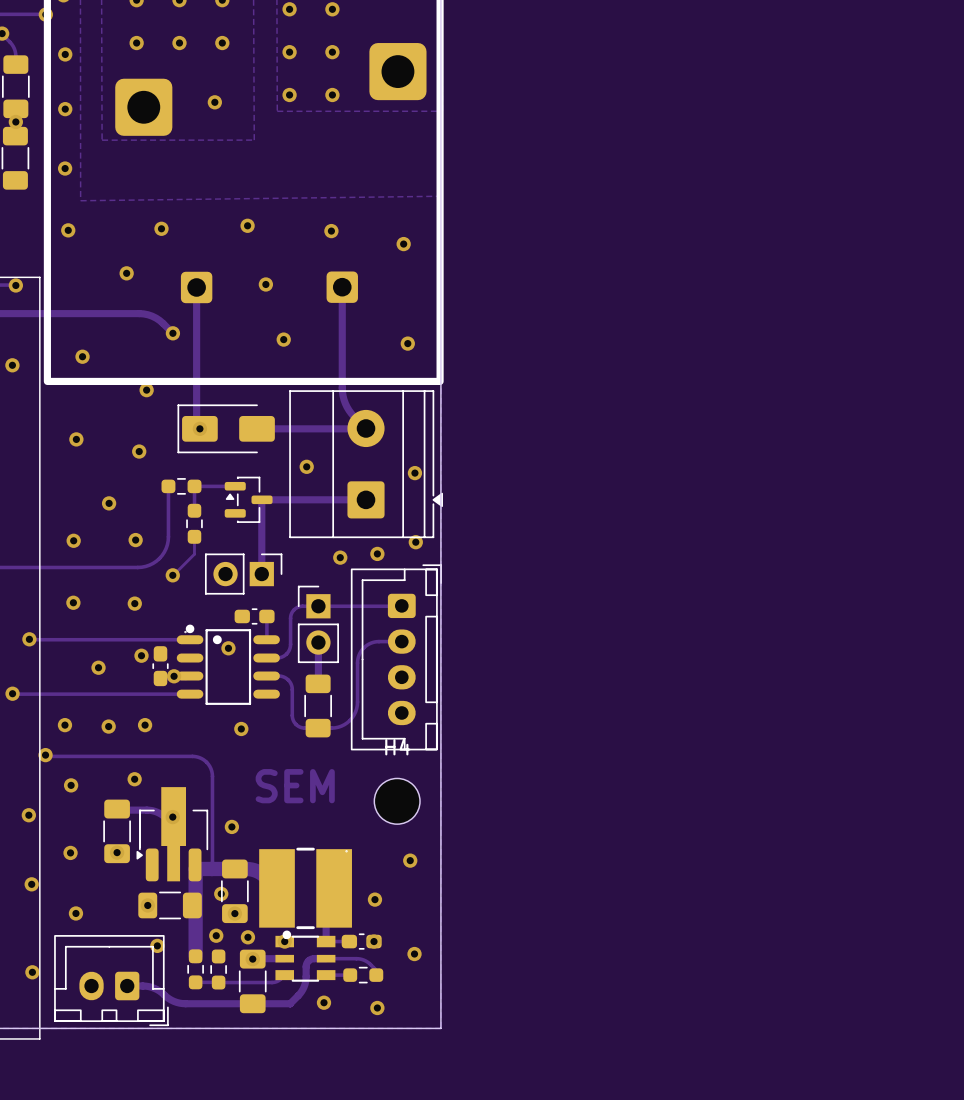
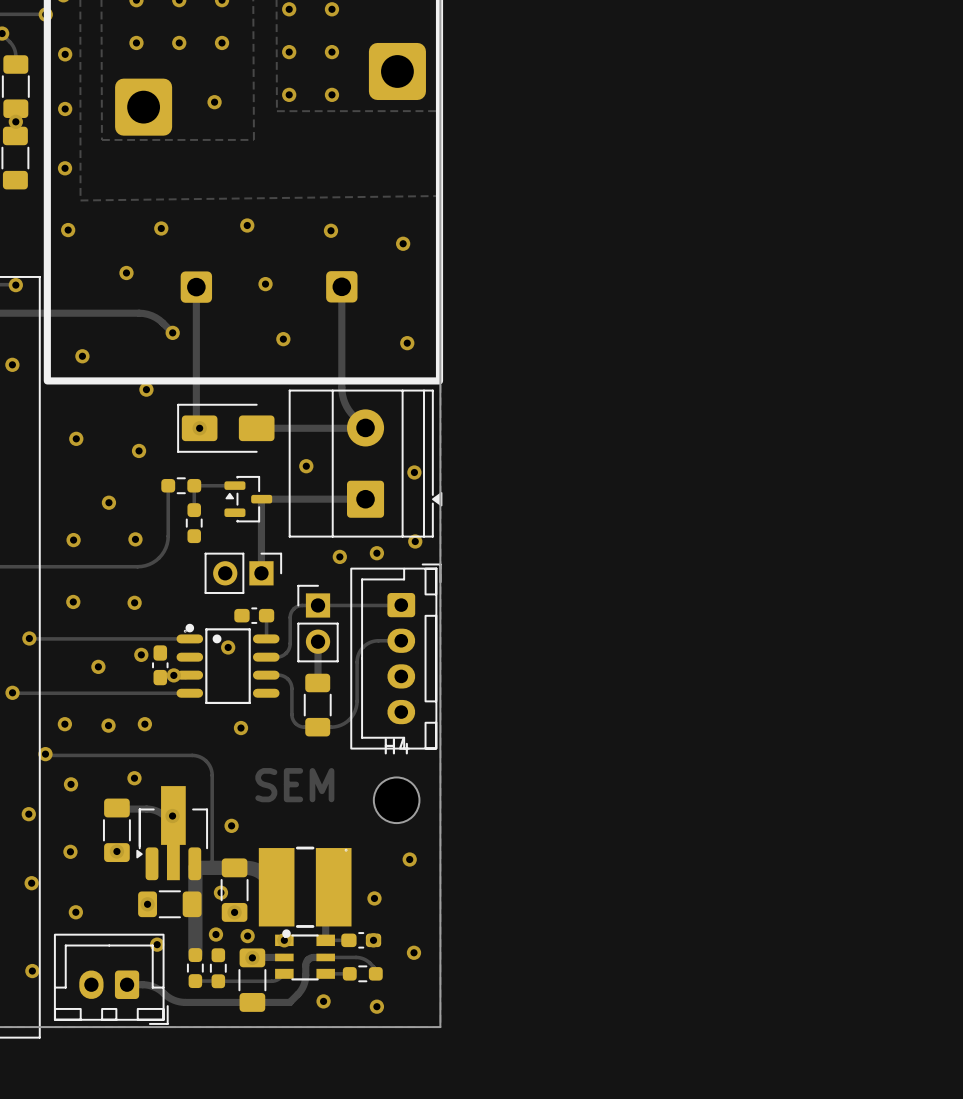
track: (194, 536) (194, 554) (172, 575) -> none
via: (172, 575) -> none

